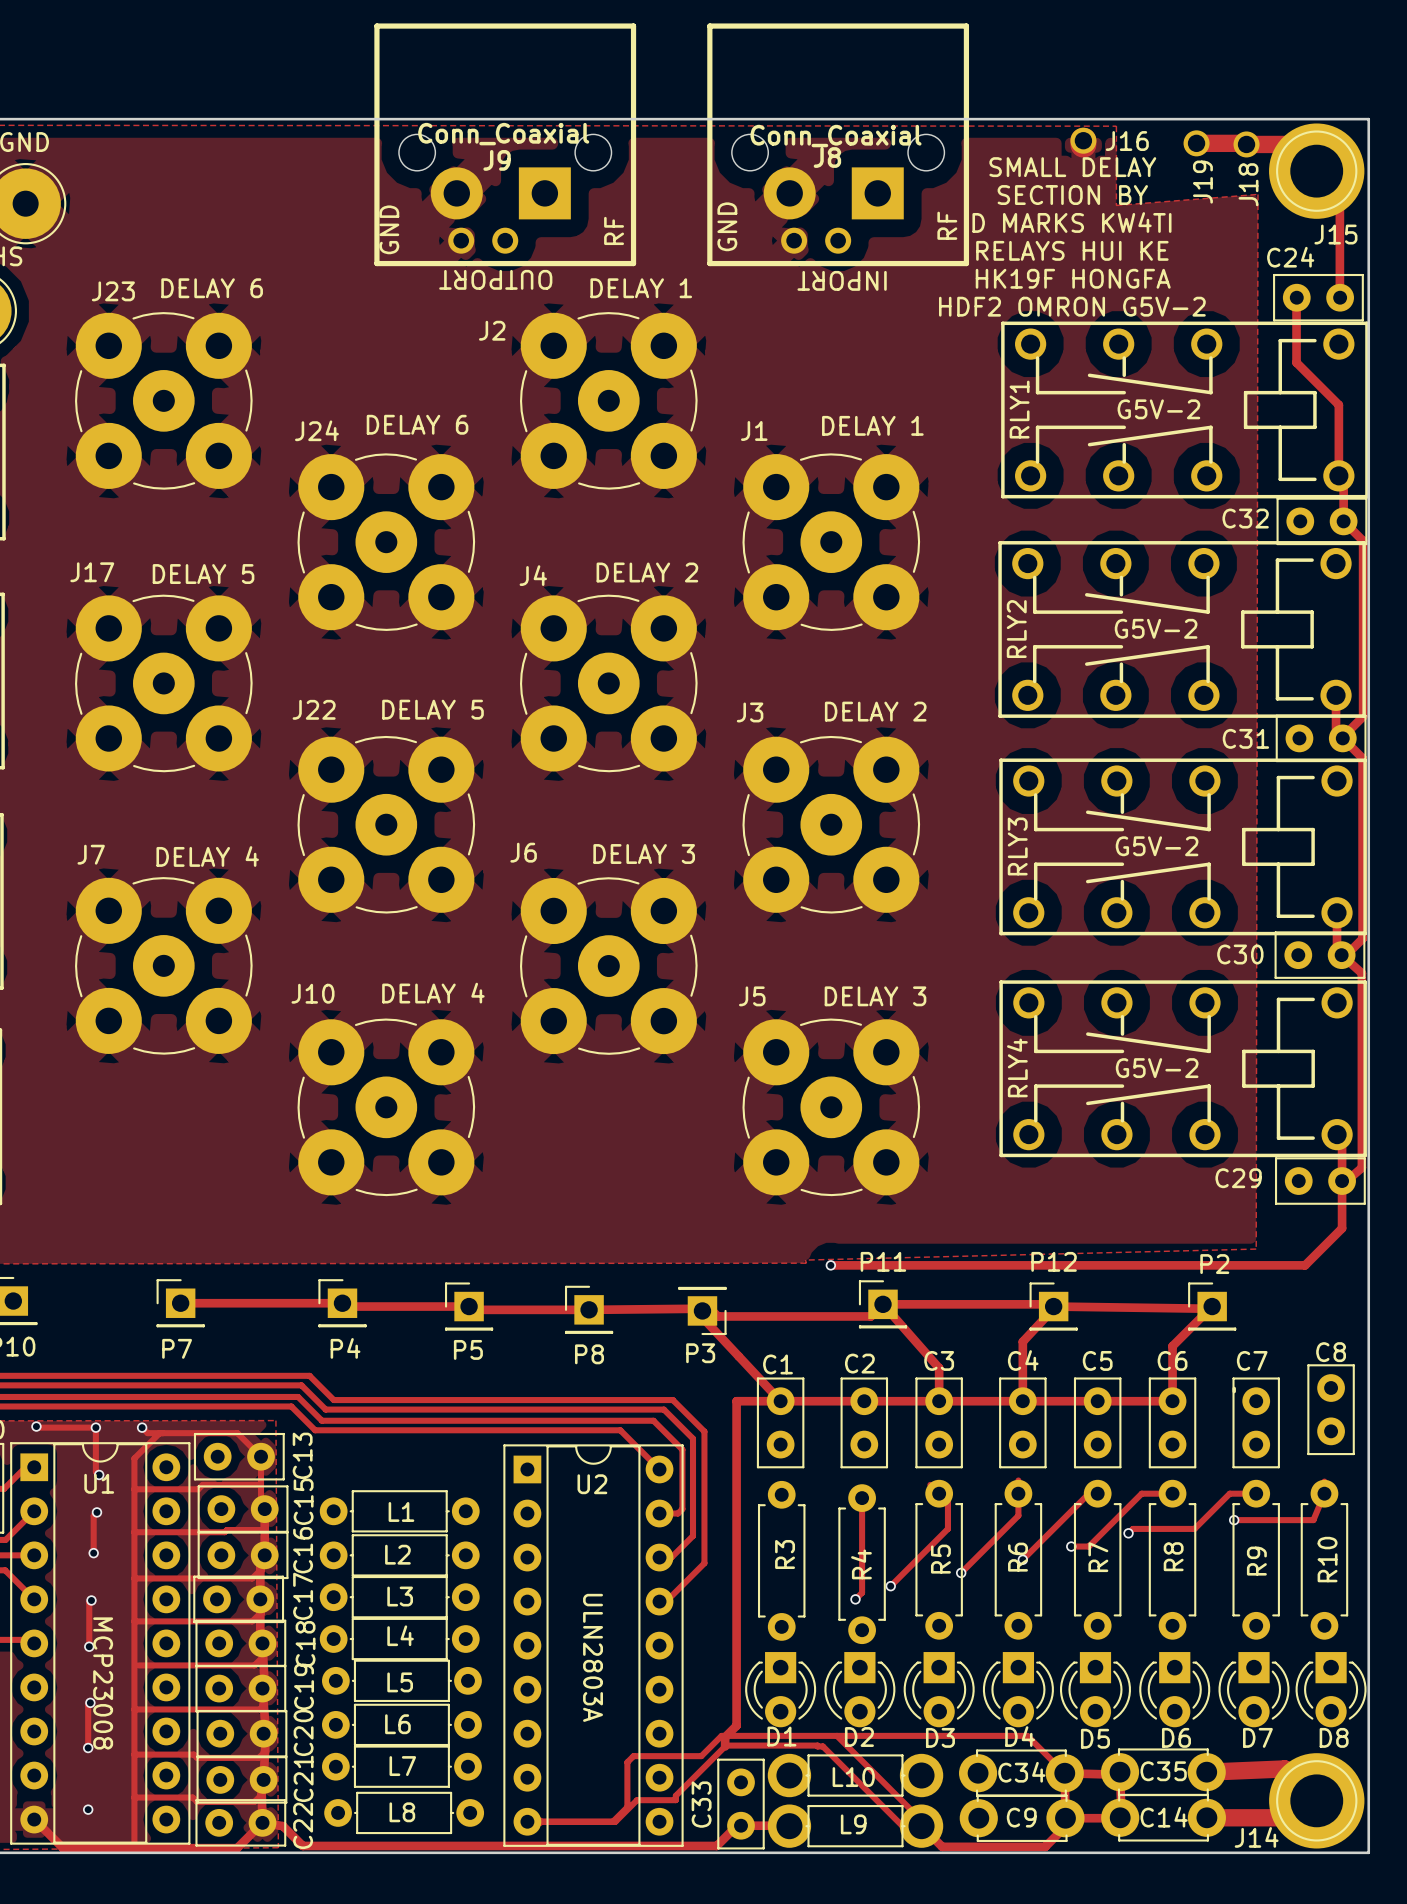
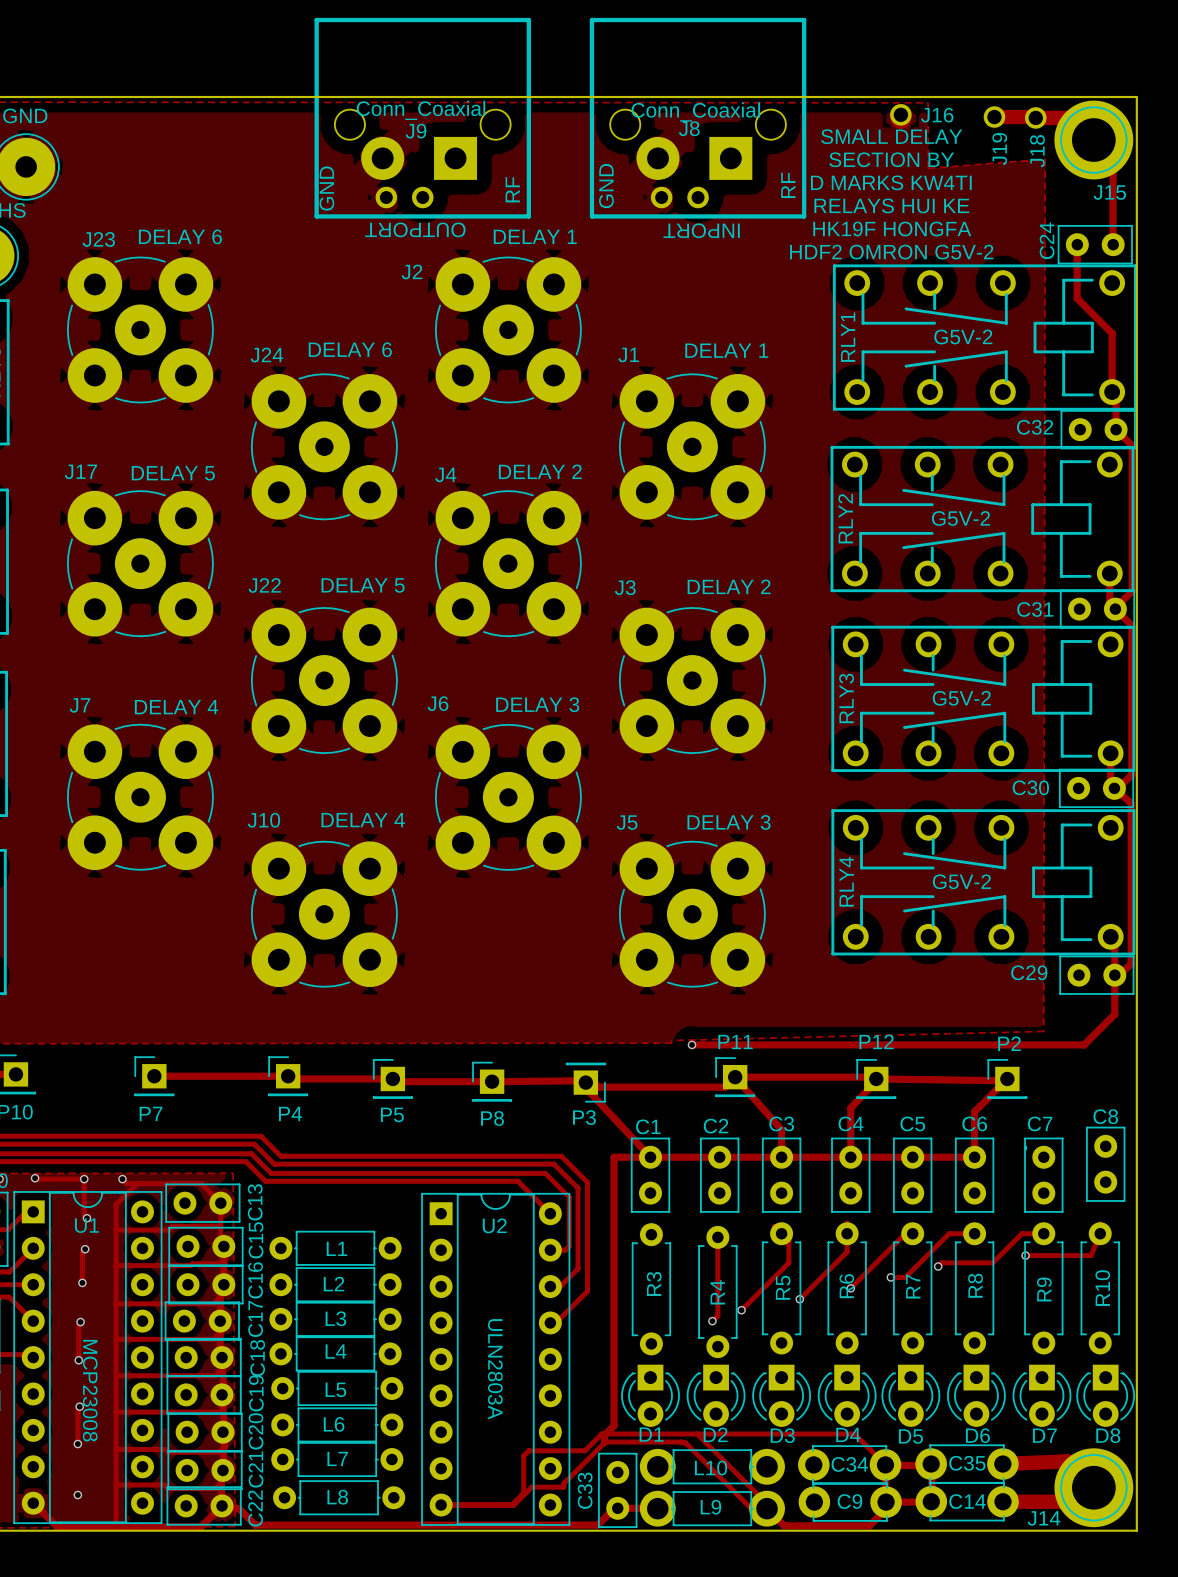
C24 name rotation: 0° (1290, 257) -> 90° counterclockwise (1047, 240)

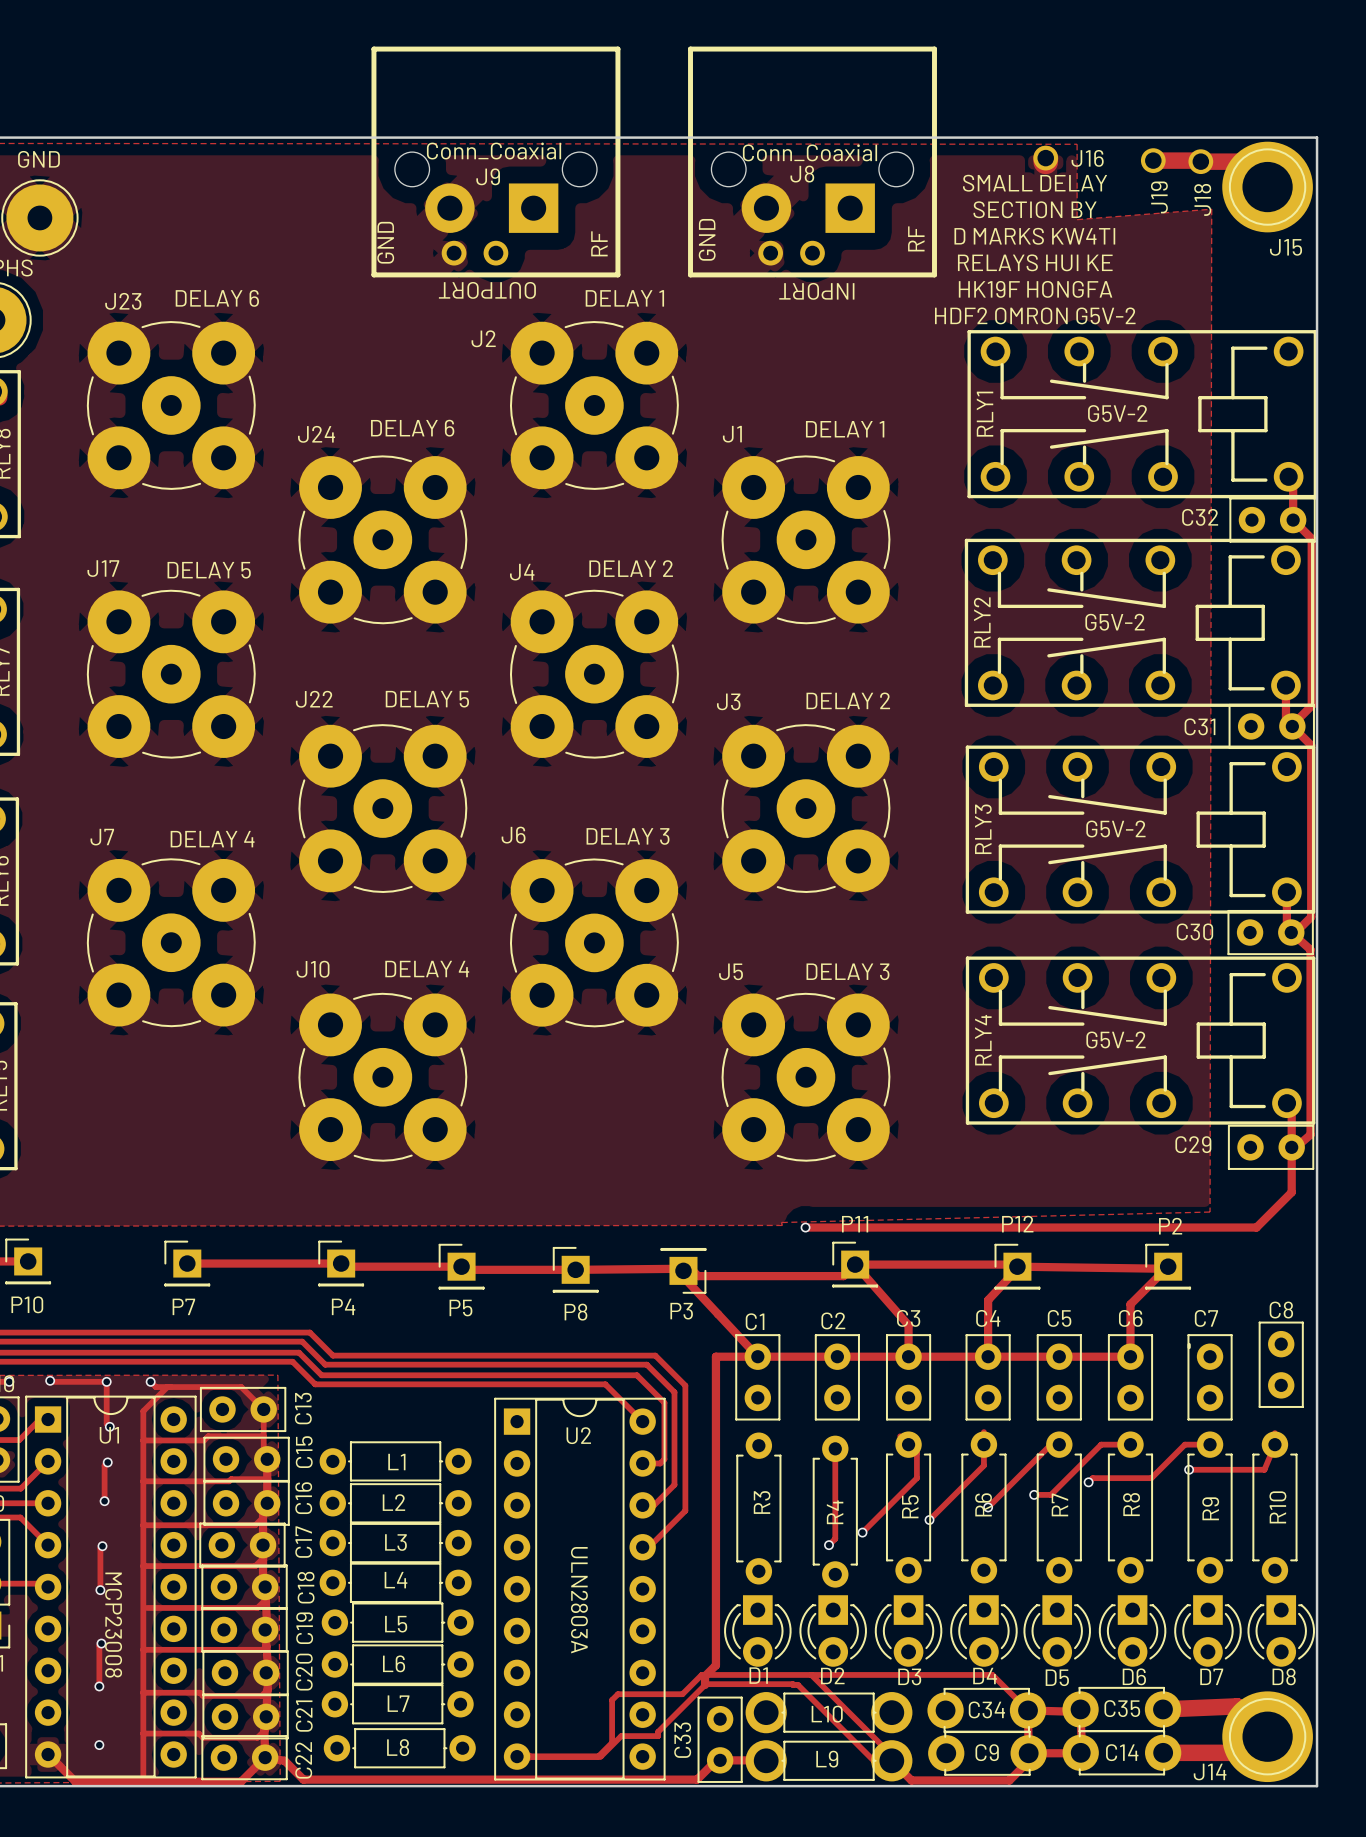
track: (1093, 140) (1112, 159) (1112, 243) -> none
track: (1077, 243) (1077, 298) (1112, 333) (1112, 392) -> none
C24: (1095, 244) -> none

